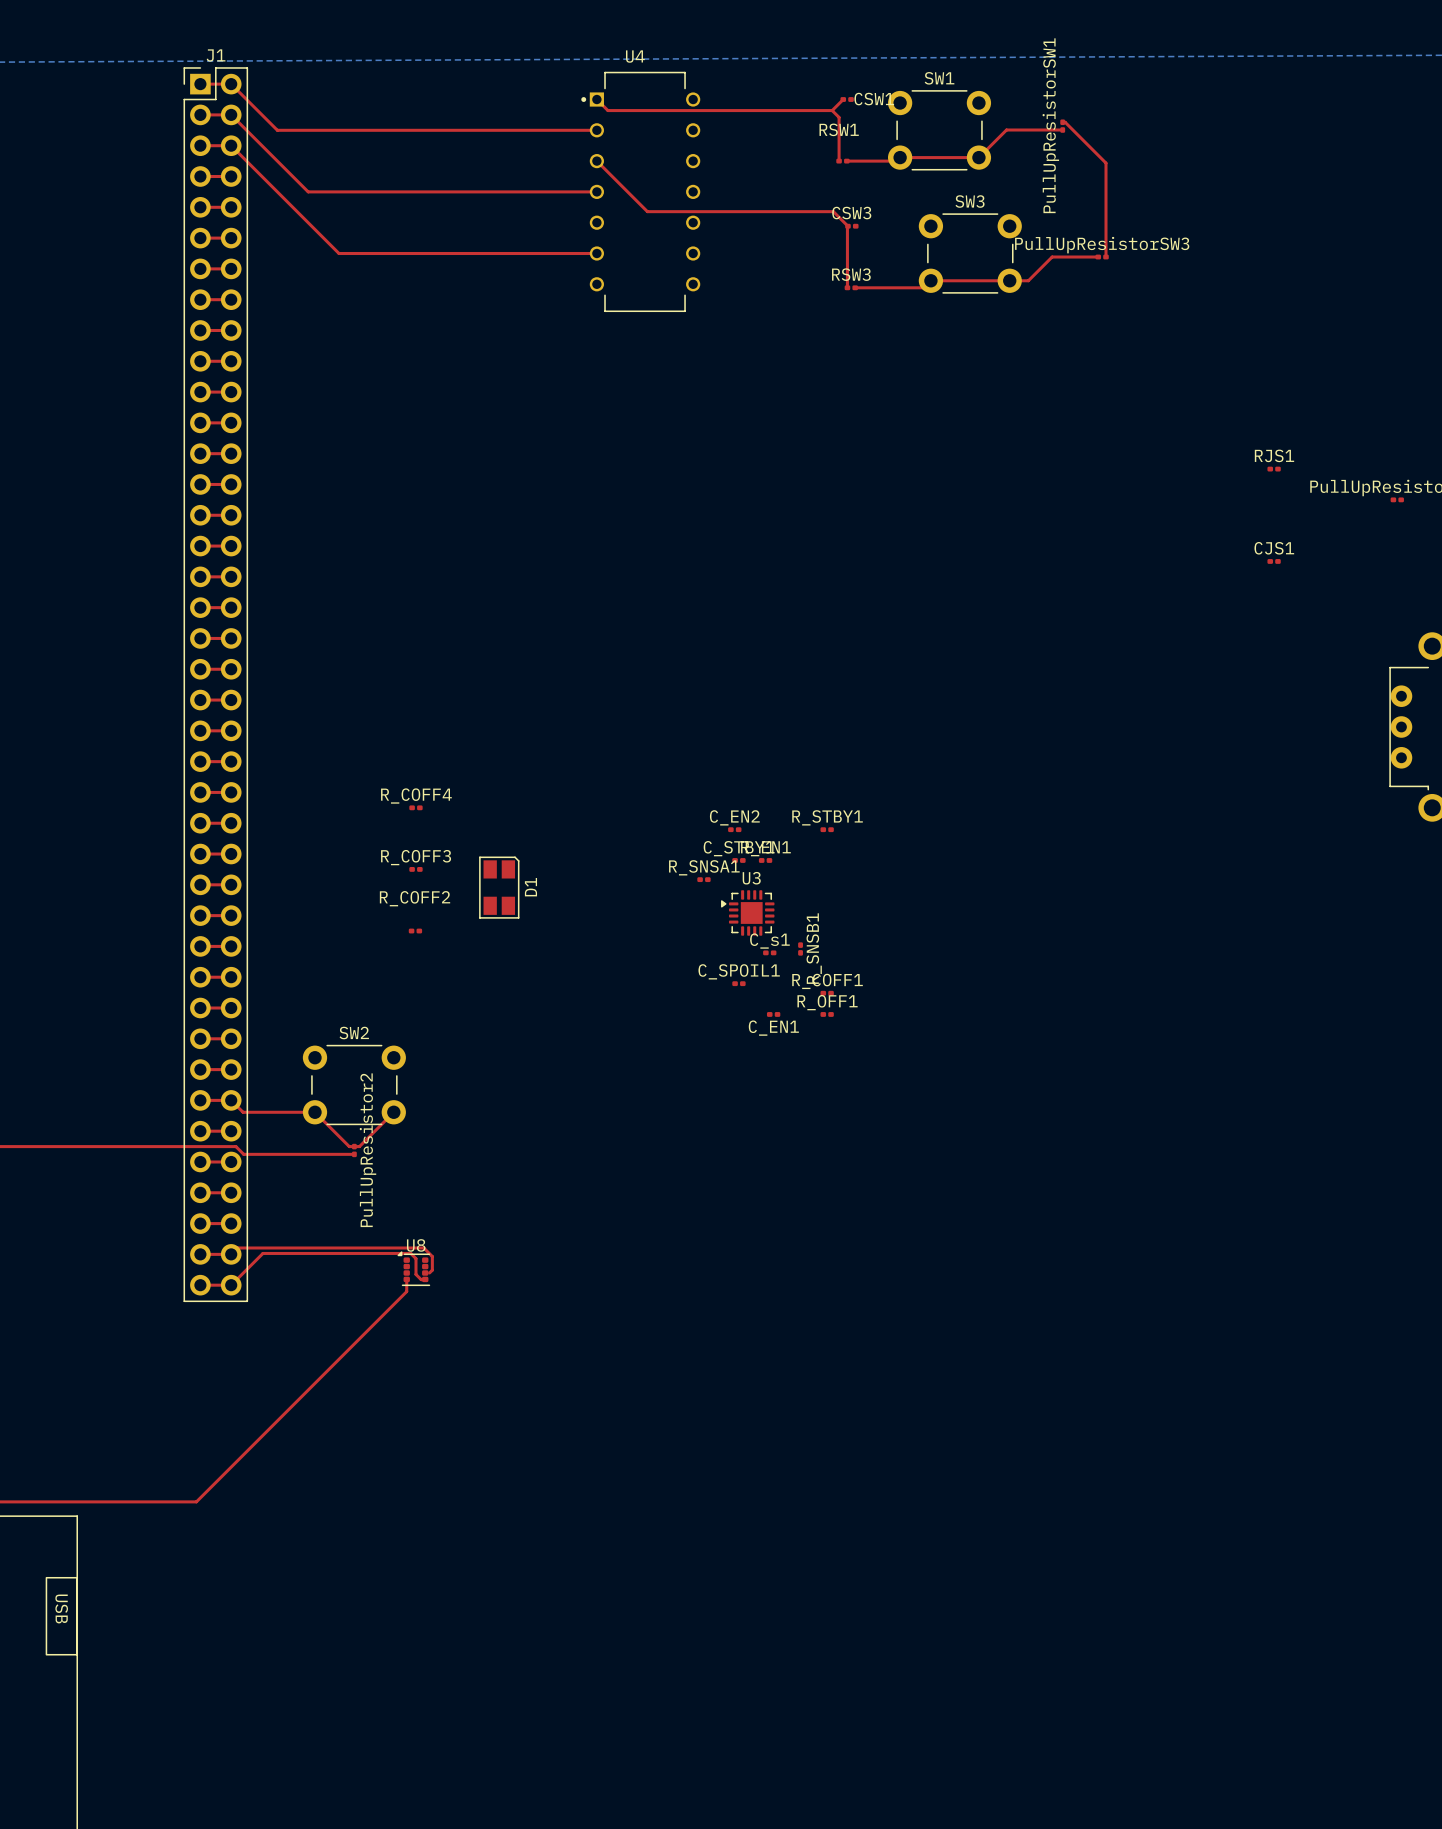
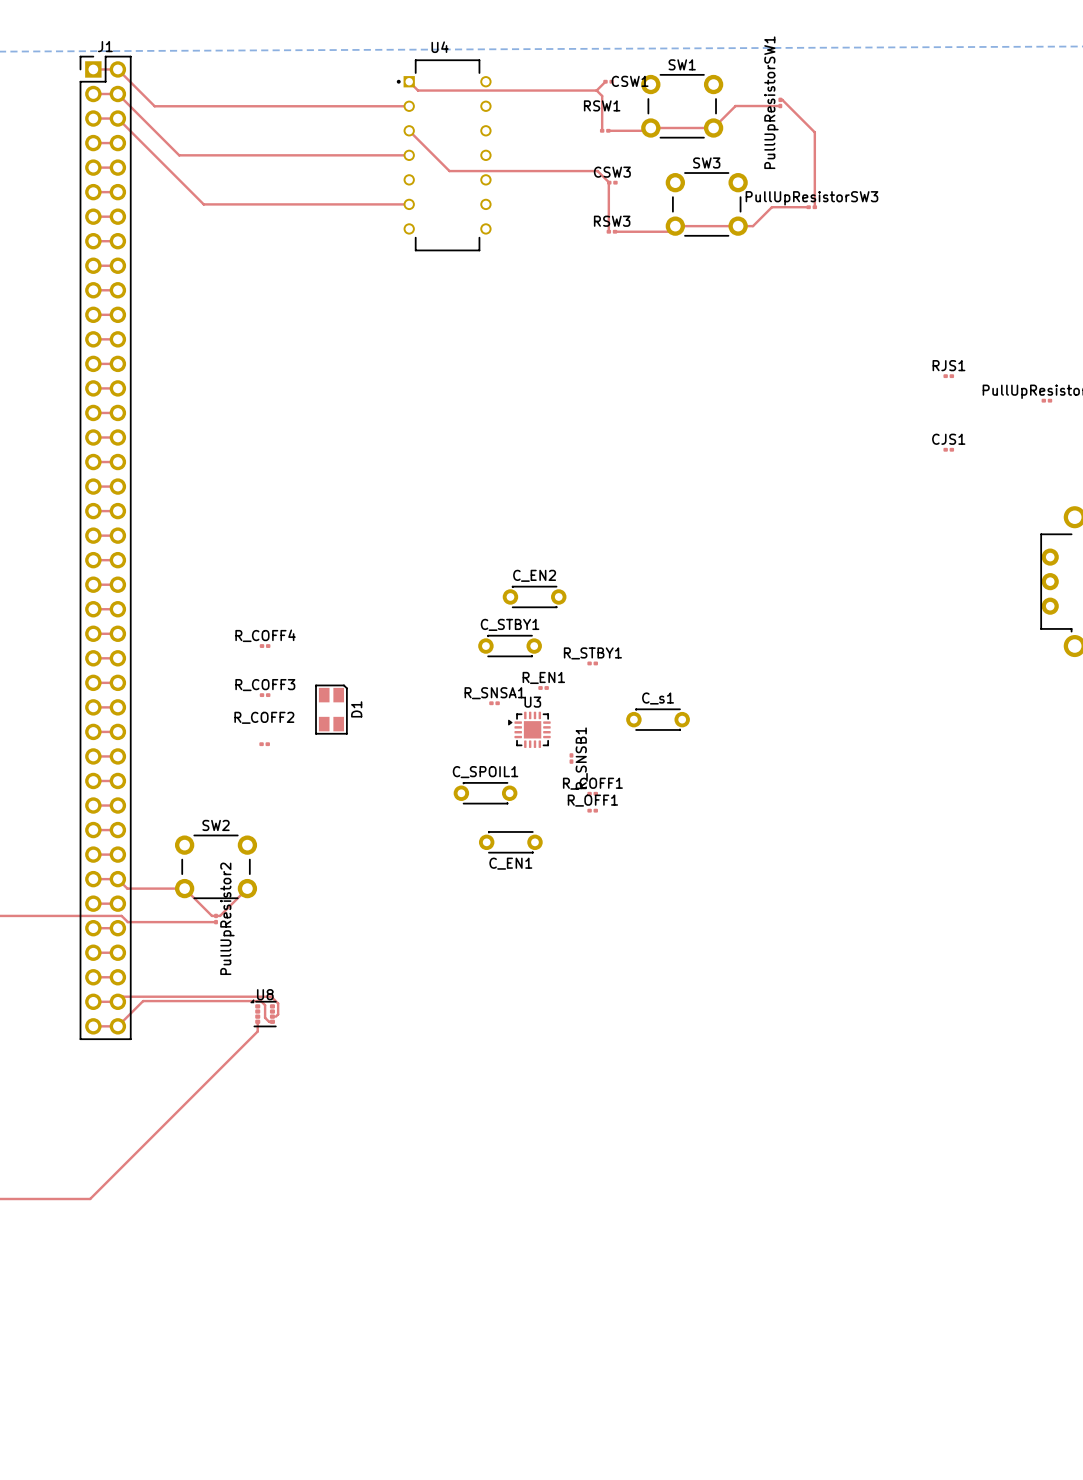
C_EN2 footprint: [728, 827, 742, 833] -> [502, 586, 567, 608]
C_STBY1 footprint: [732, 858, 746, 863] -> [478, 635, 542, 657]
C_s1 footprint: [763, 950, 777, 956] -> [626, 708, 690, 731]
C_SPOIL1 footprint: [732, 981, 746, 987] -> [453, 782, 518, 805]
C_EN1 footprint: [766, 1012, 781, 1017] -> [478, 831, 543, 854]

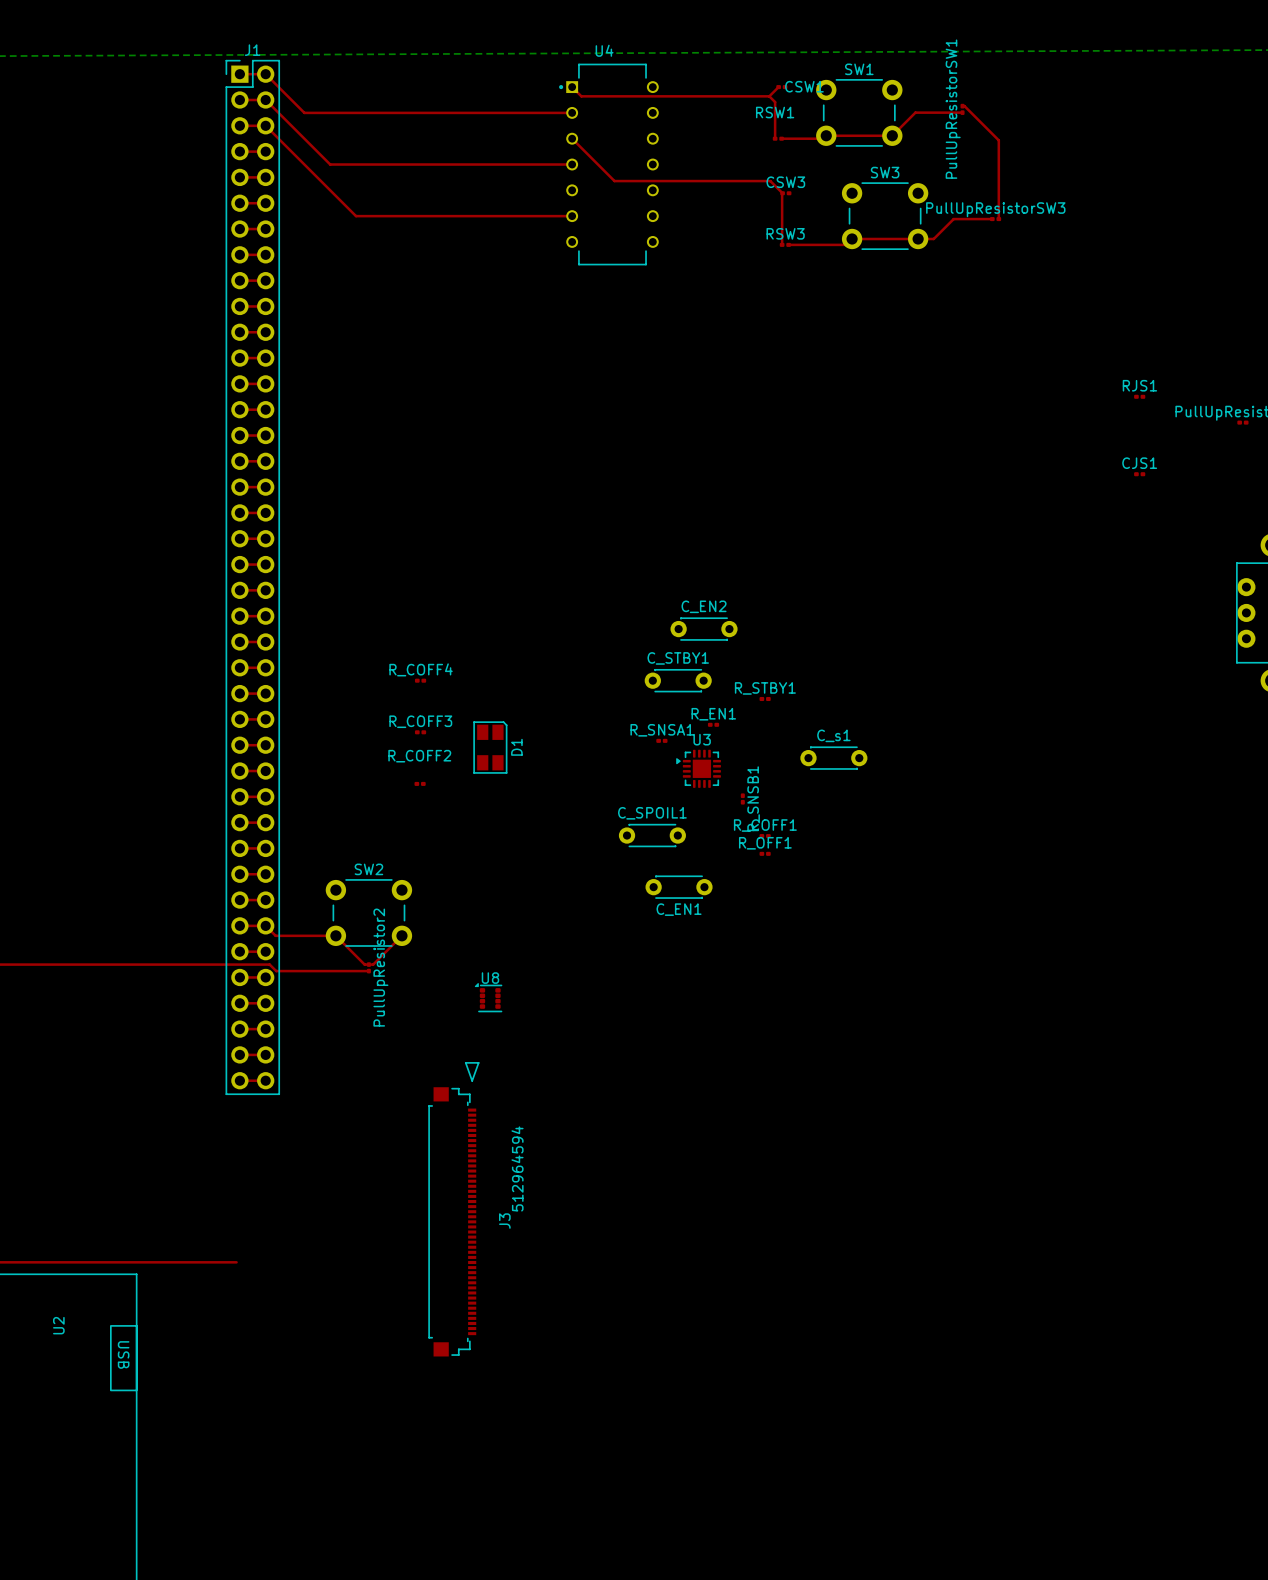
top track: (122, 996) (271, 996) (278, 1003) (278, 1014) (275, 1016) -> none
U8 position: (263, 1013) -> (488, 997)
top track: (257, 1021) (257, 1031) (90, 1198) -> none
top track: (272, 1021) (269, 1021) (265, 1017) (265, 1005) (260, 1001) (143, 1001) (117, 1026) -> none
J3: none -> (453, 1209)

